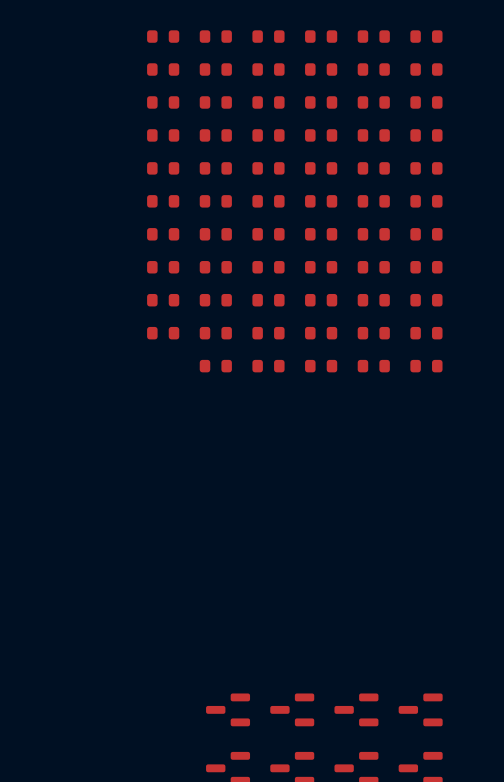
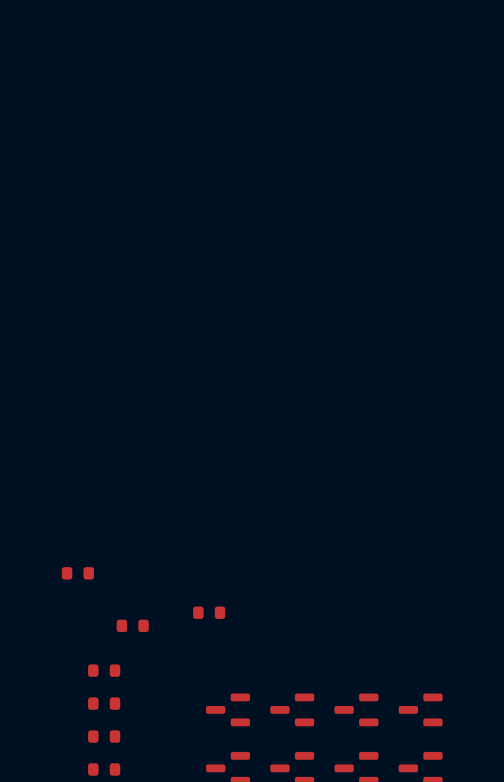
part: (163, 36) -> none
part: (215, 36) -> none
part: (268, 36) -> none
part: (321, 36) -> none
part: (373, 36) -> none
part: (426, 36) -> none
part: (163, 69) -> none
part: (215, 69) -> none
part: (268, 69) -> none
part: (321, 69) -> none
part: (373, 69) -> none
part: (426, 69) -> none
part: (163, 102) -> none
part: (215, 102) -> none
part: (268, 102) -> none
part: (321, 102) -> none
part: (373, 102) -> none
part: (426, 102) -> none
part: (163, 135) -> none
part: (215, 135) -> none
part: (268, 135) -> none
part: (321, 135) -> none
part: (373, 135) -> none
part: (426, 135) -> none
part: (163, 168) -> none
part: (215, 168) -> none
part: (268, 168) -> none
part: (321, 168) -> none
part: (373, 168) -> none
part: (426, 168) -> none
part: (163, 201) -> none
part: (215, 201) -> none
part: (268, 201) -> none
part: (321, 201) -> none
part: (373, 201) -> none
part: (426, 201) -> none
part: (163, 234) -> none
part: (215, 234) -> none
part: (268, 234) -> none
part: (321, 234) -> none
part: (373, 234) -> none
part: (426, 234) -> none
part: (163, 267) -> none
part: (215, 267) -> none
part: (268, 267) -> none
part: (321, 267) -> none
part: (373, 267) -> none
part: (426, 267) -> none
part: (163, 300) -> none
part: (215, 300) -> none
part: (268, 300) -> none
part: (321, 300) -> none
part: (373, 300) -> none
part: (426, 300) -> none
part: (163, 333) -> none
part: (215, 333) -> none
part: (268, 333) -> none
part: (321, 333) -> none
part: (373, 333) -> none
part: (426, 333) -> none
part: (215, 366) -> none
part: (268, 366) -> none
part: (321, 366) -> none
part: (373, 366) -> none
part: (426, 366) -> none
part: none -> (77, 573)
part: none -> (209, 612)
part: none -> (132, 625)
part: none -> (104, 670)
part: none -> (104, 703)
part: none -> (104, 736)
part: none -> (104, 769)

